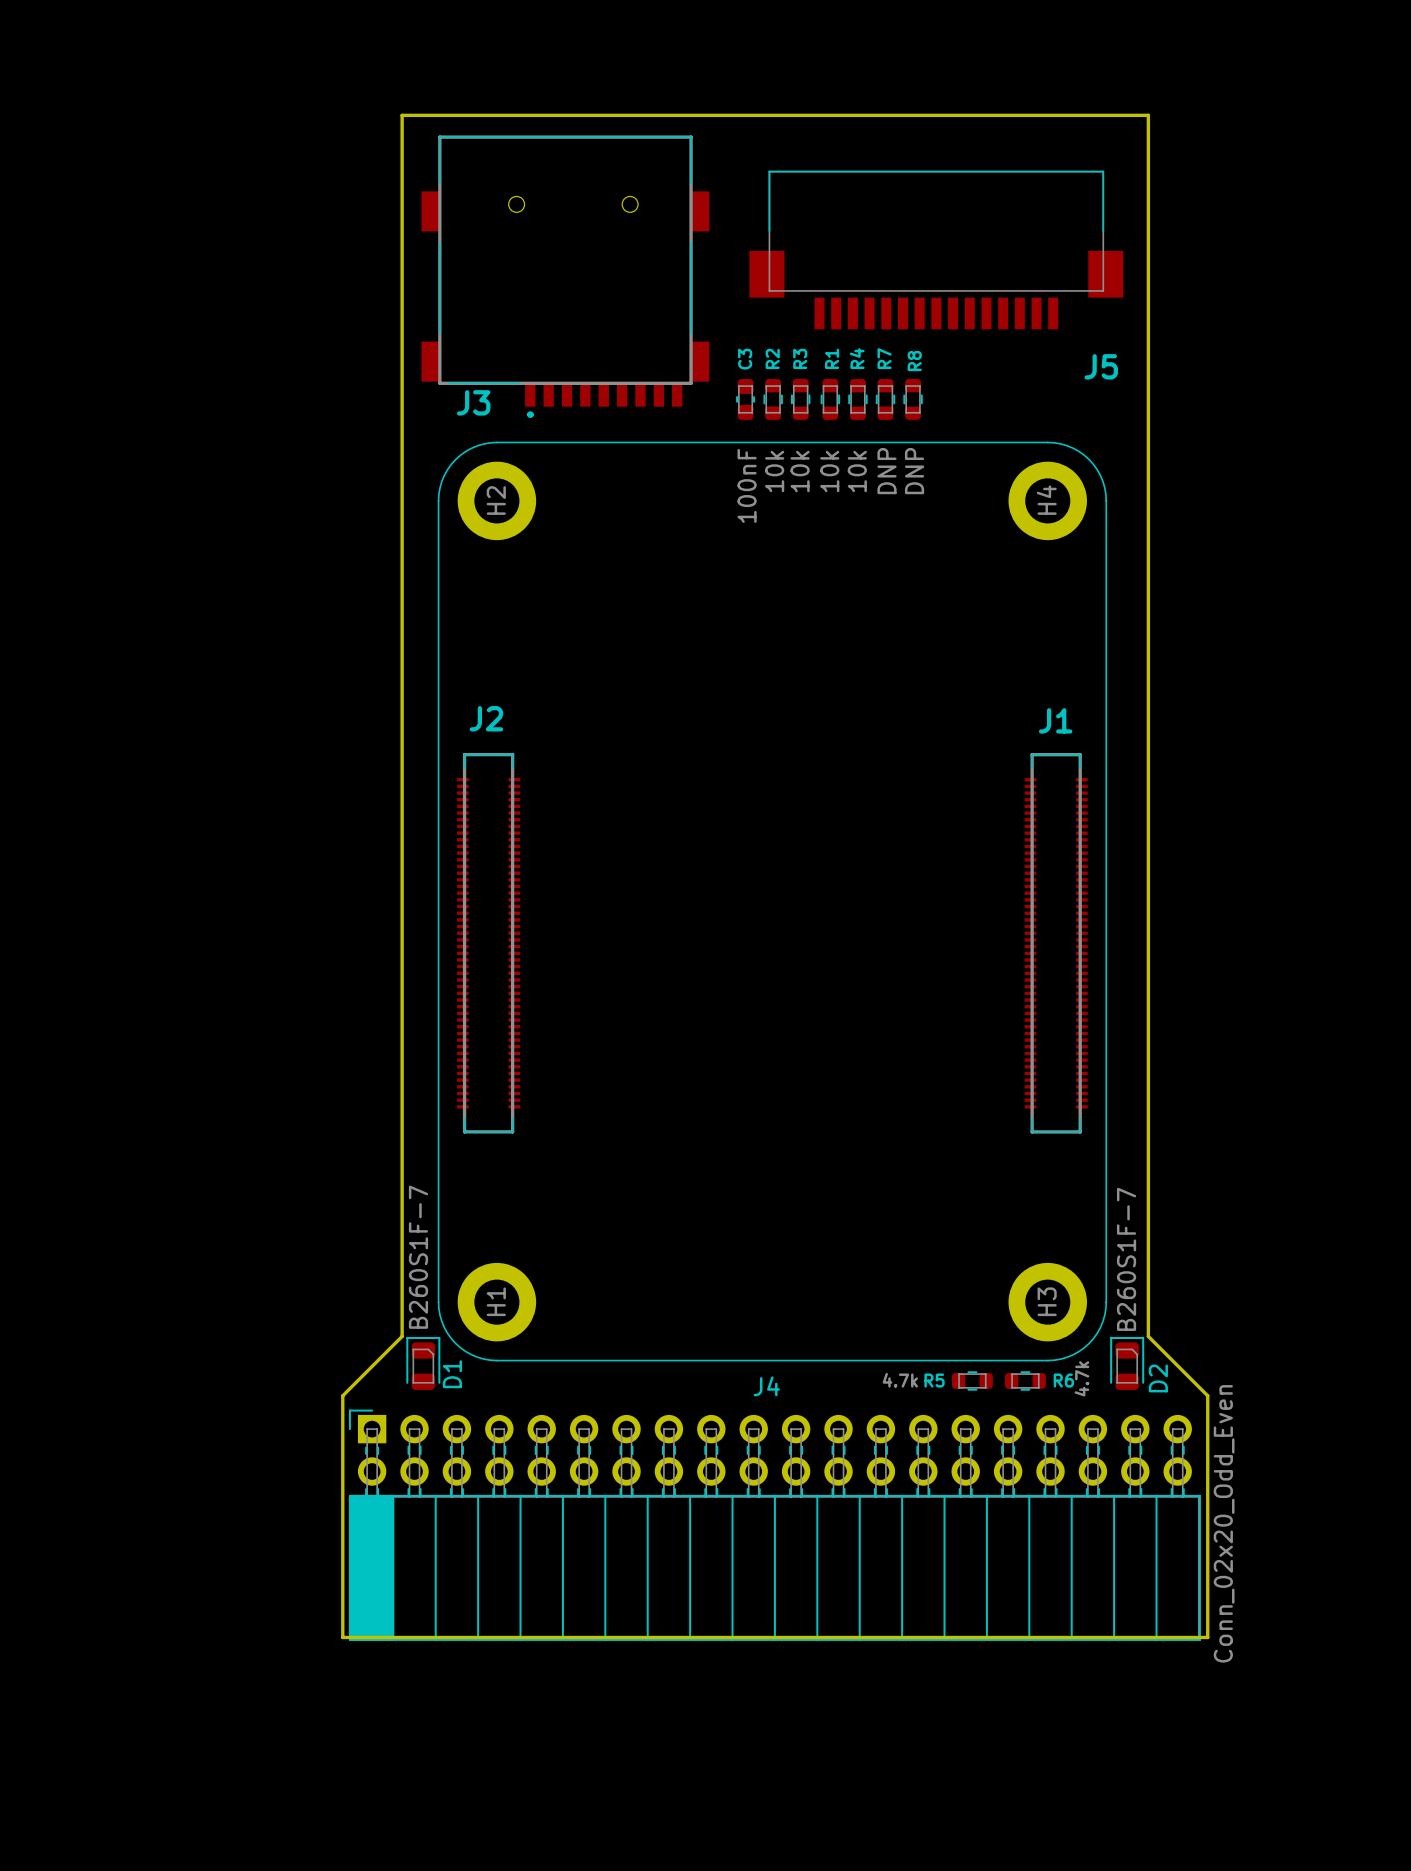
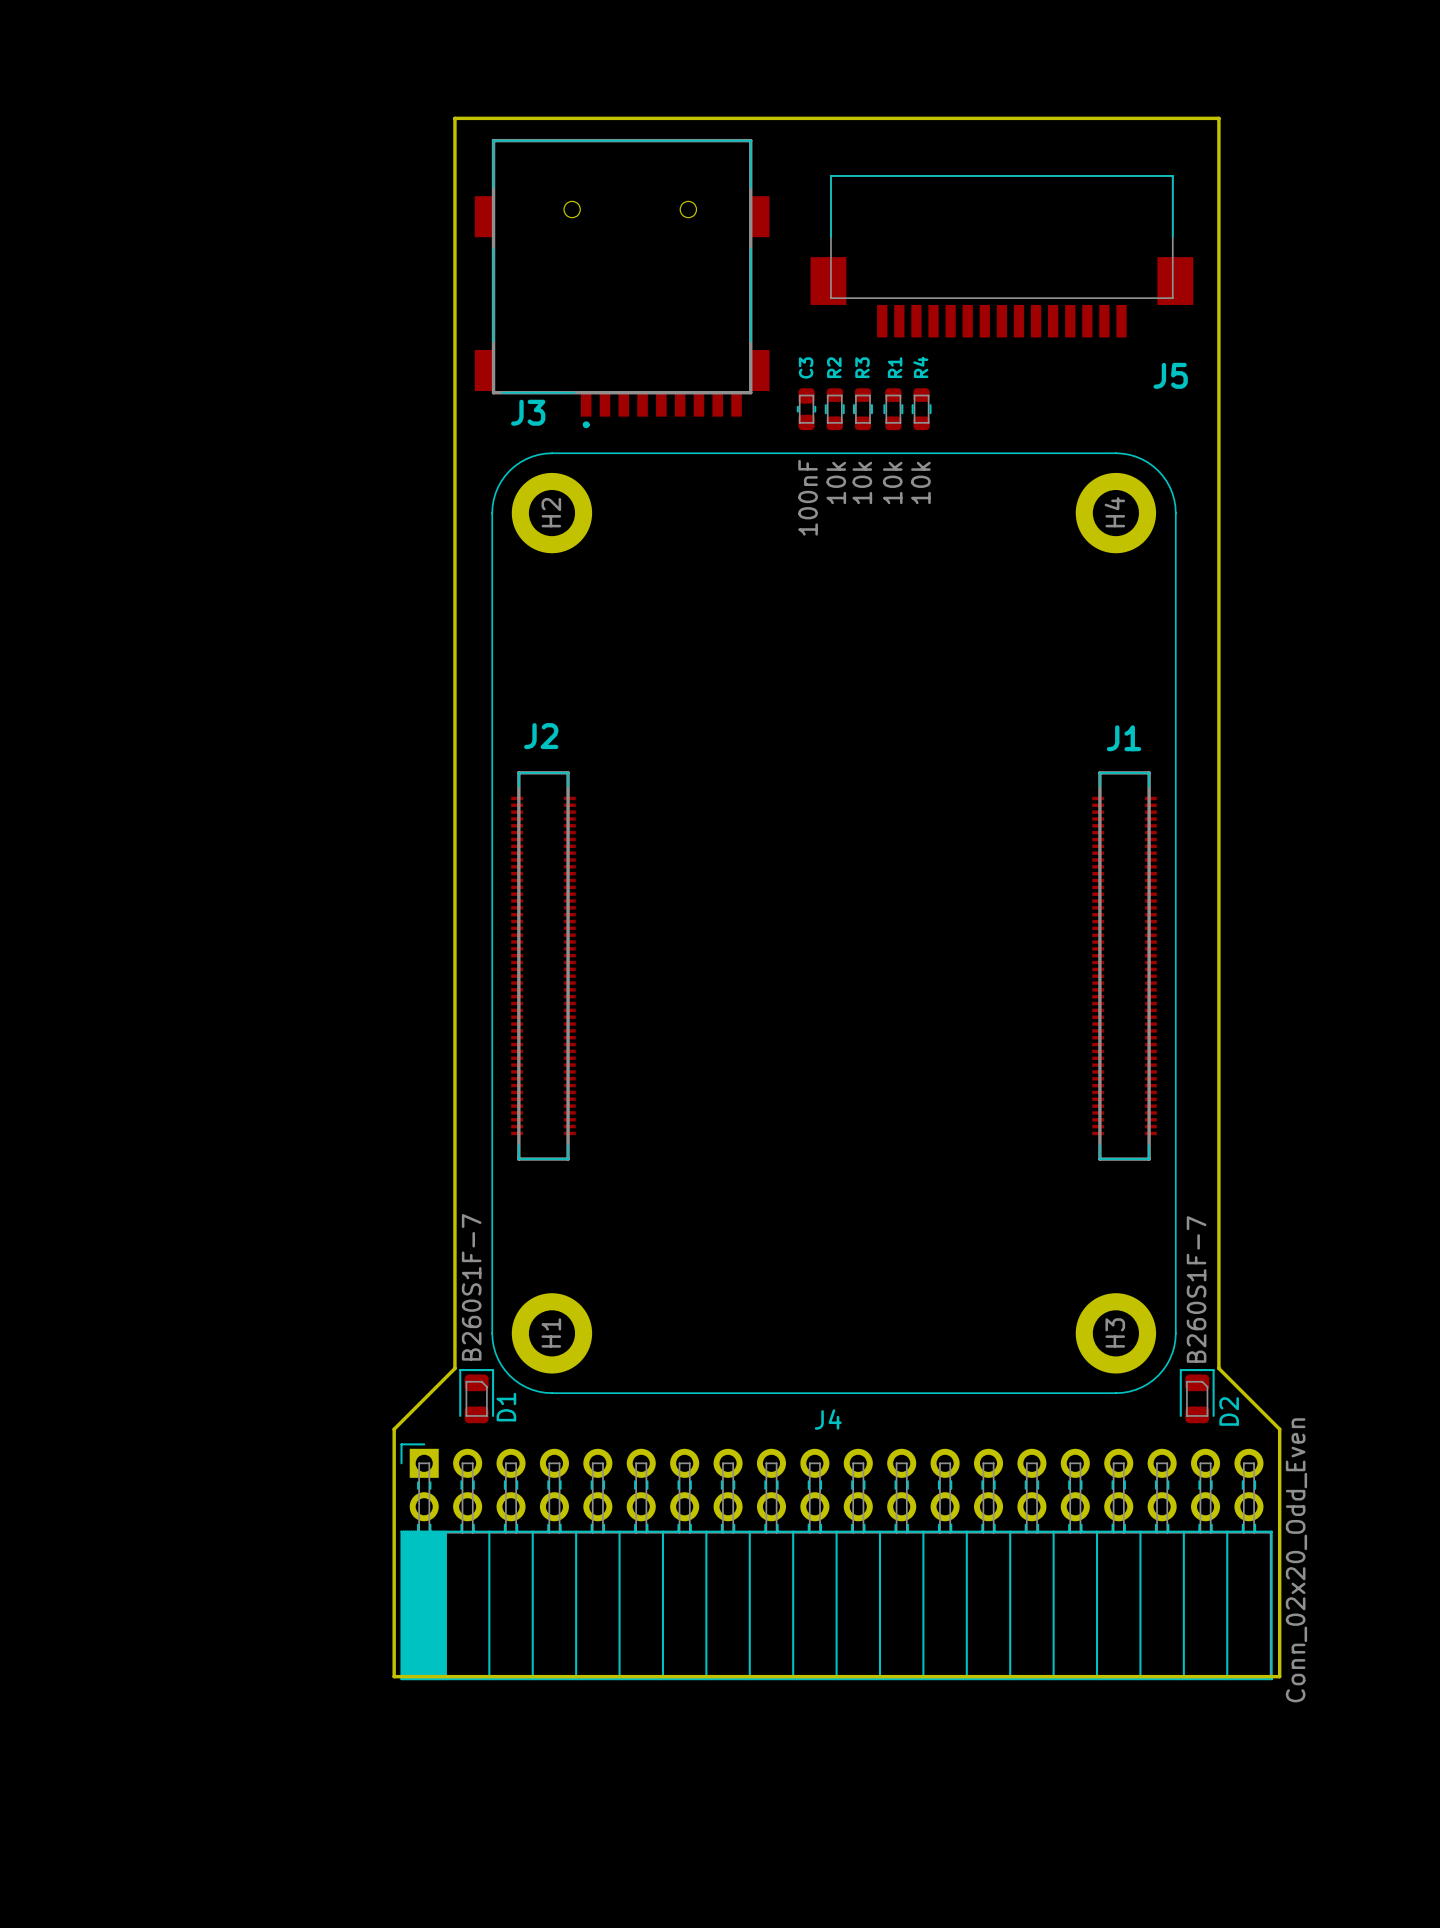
R7: DNP (885, 399) -> none
R8: DNP (913, 399) -> none
R5: 4.7k (972, 1380) -> none
R6: 4.7k (1025, 1380) -> none

